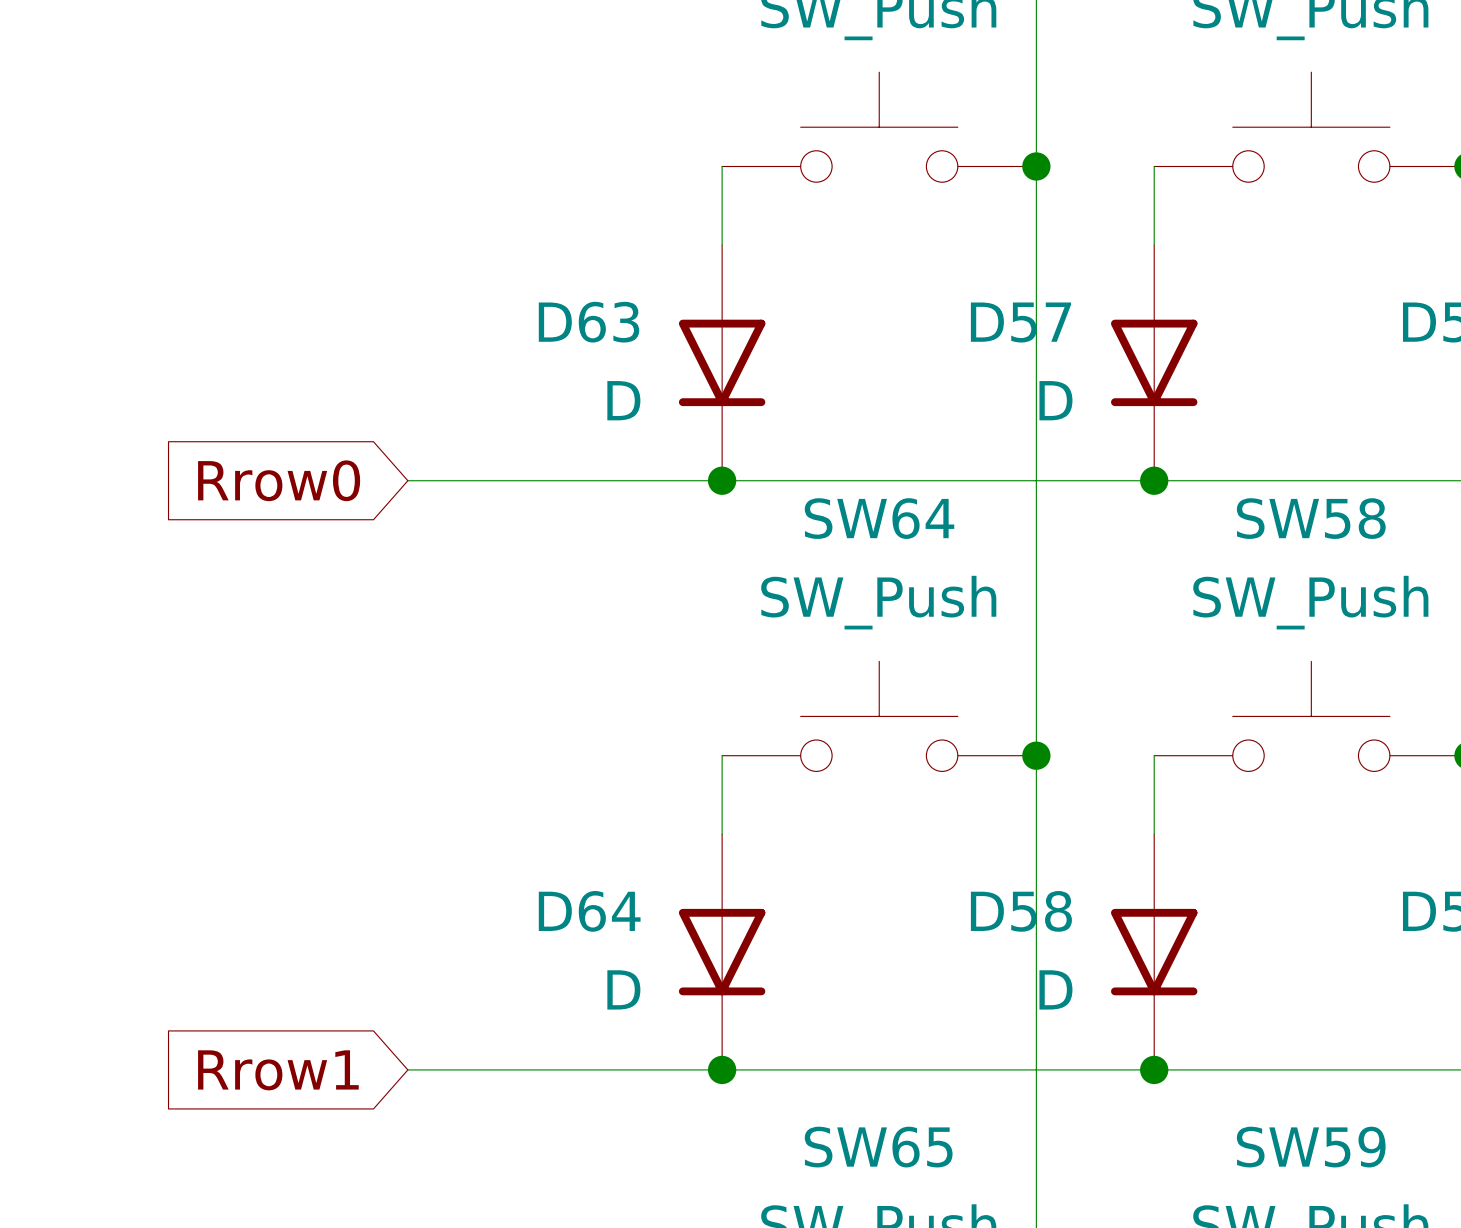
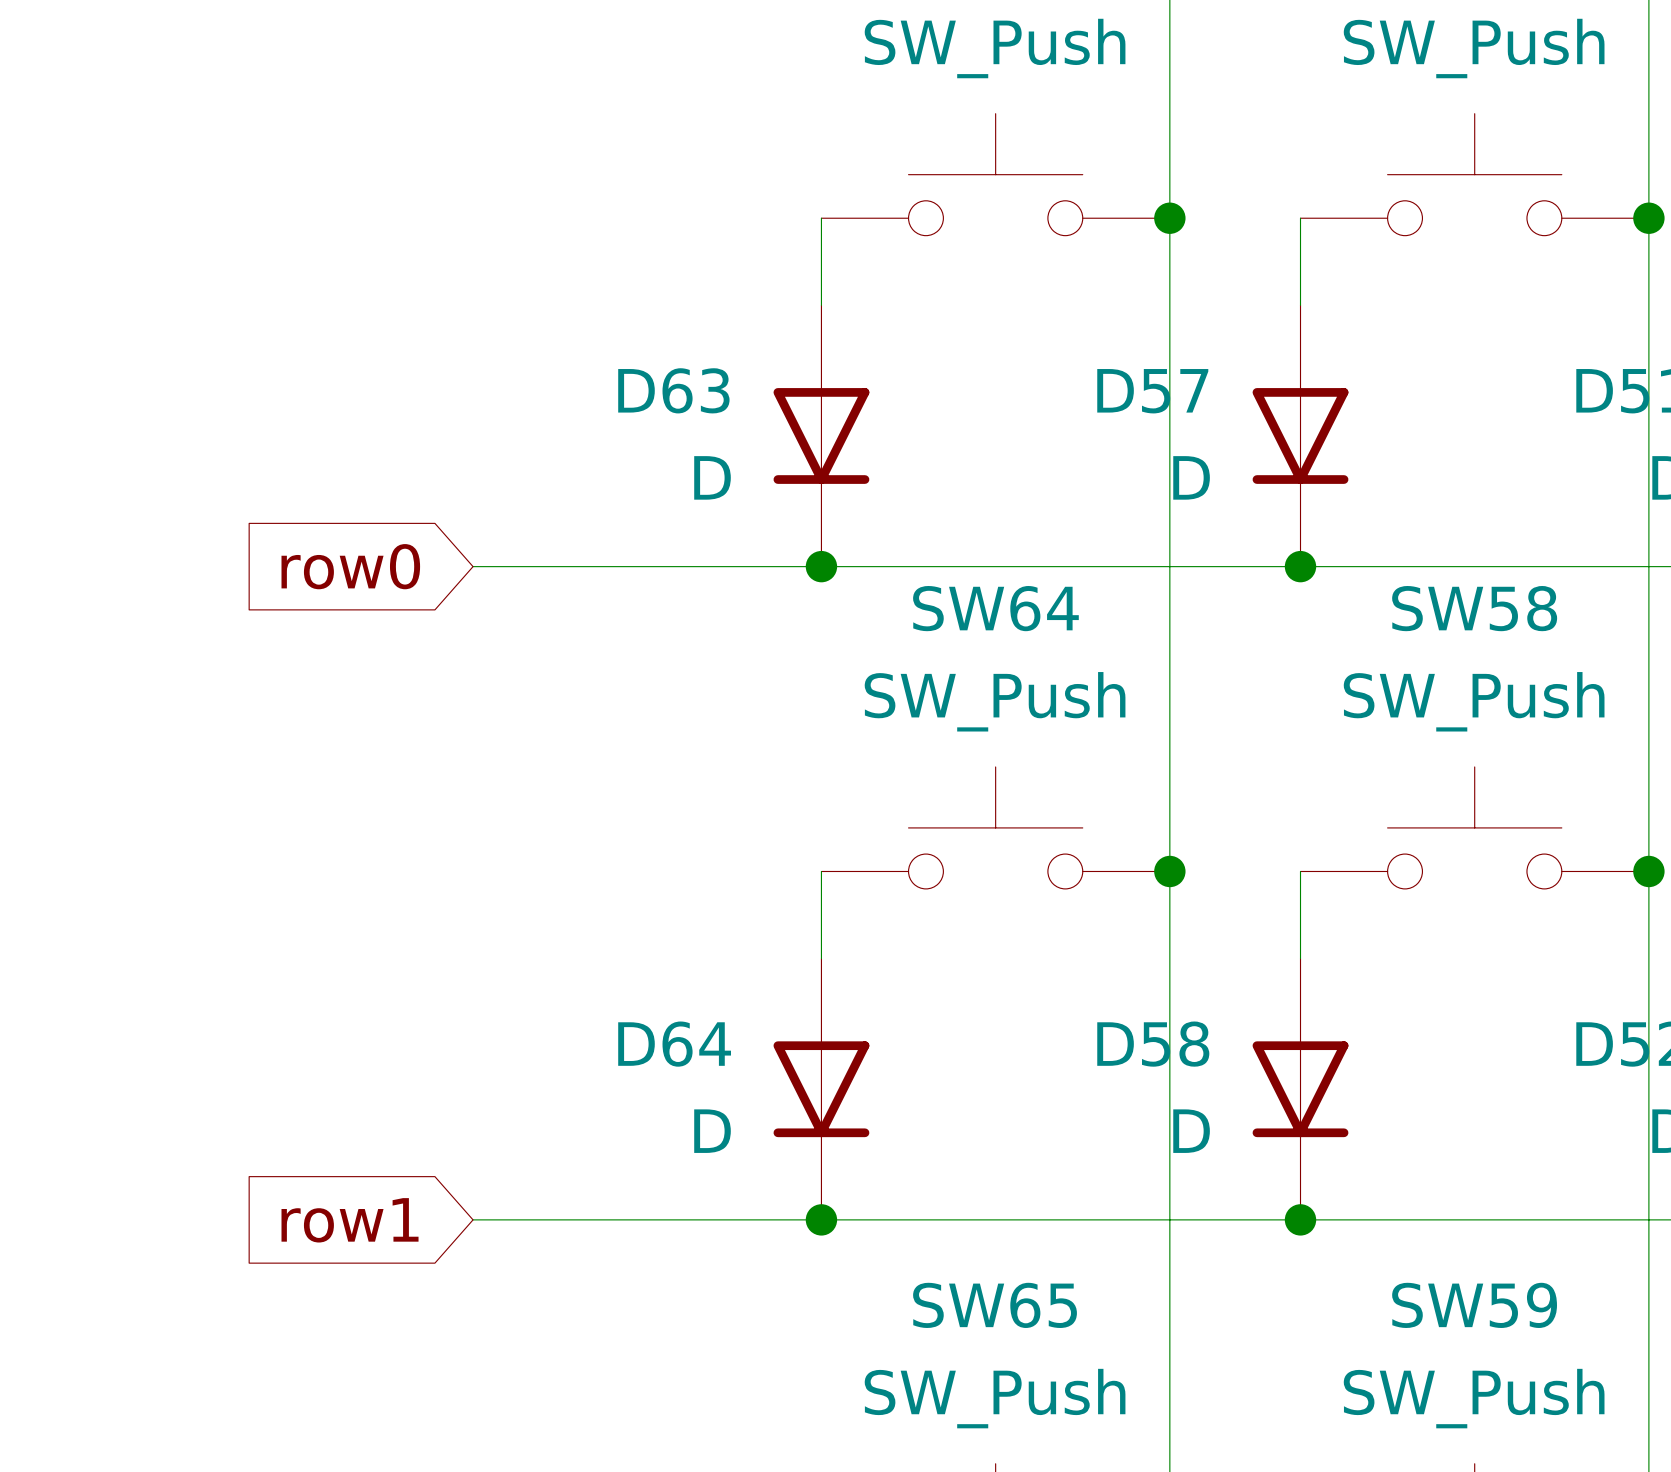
global label: Rrow0 (279, 480) -> row0 (350, 566)
global label: Rrow1 (278, 1070) -> row1 (350, 1220)

